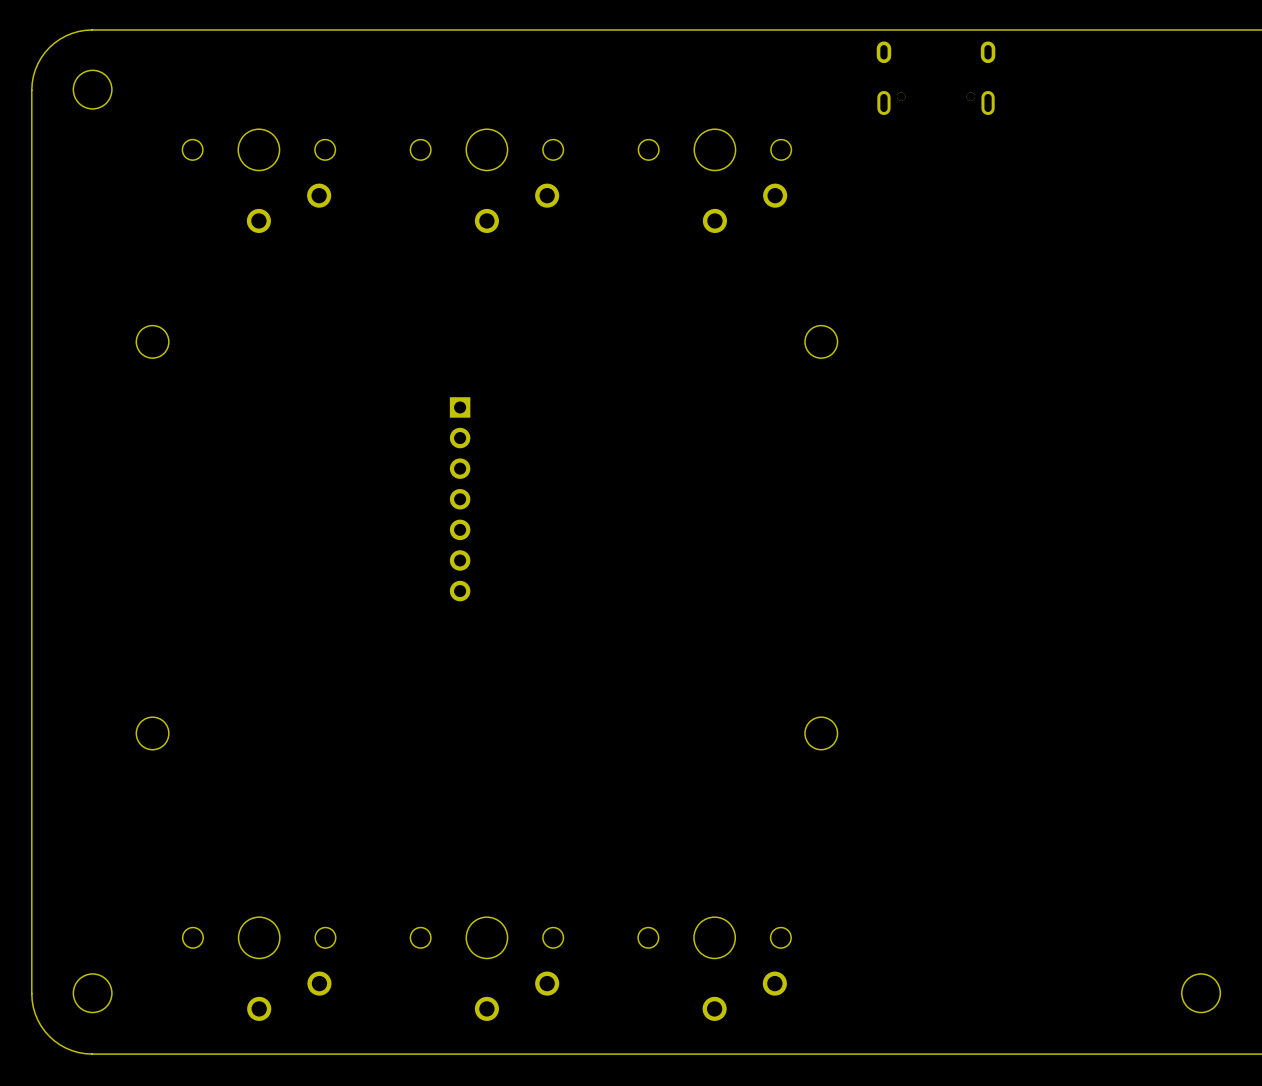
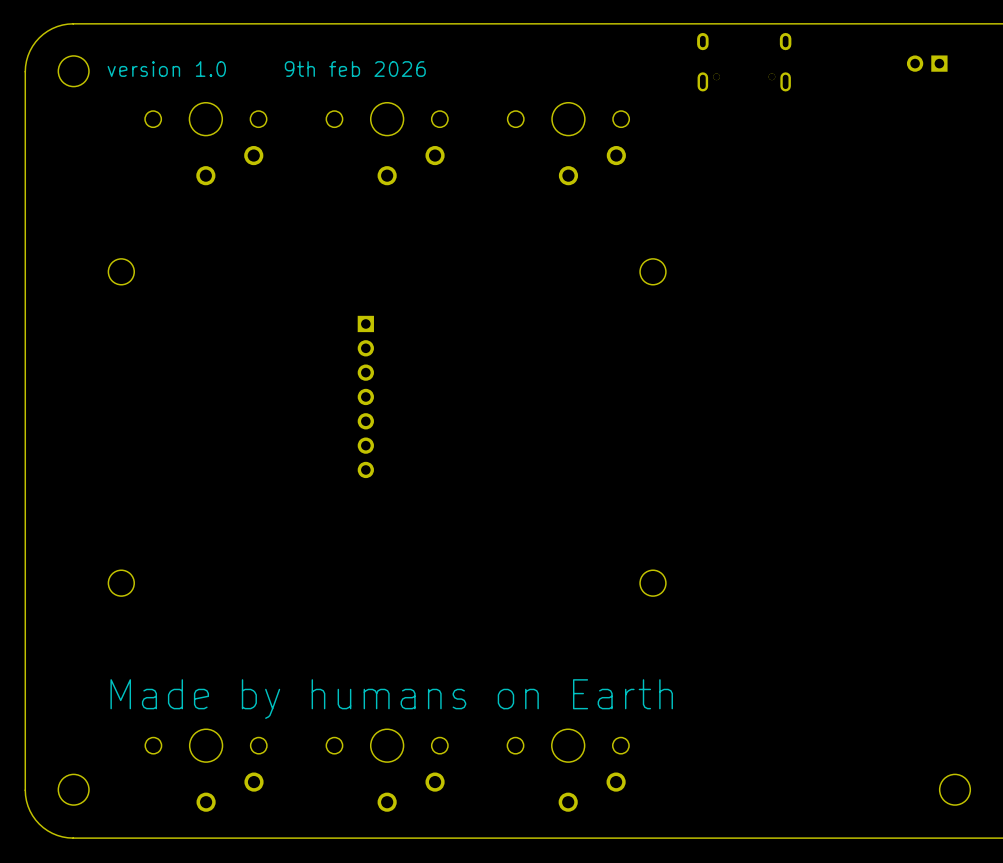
part: none -> (927, 63)
text: none -> version 1.0 9th feb 2026 (266, 69)
text: none -> Made by humans on Earth (391, 699)

